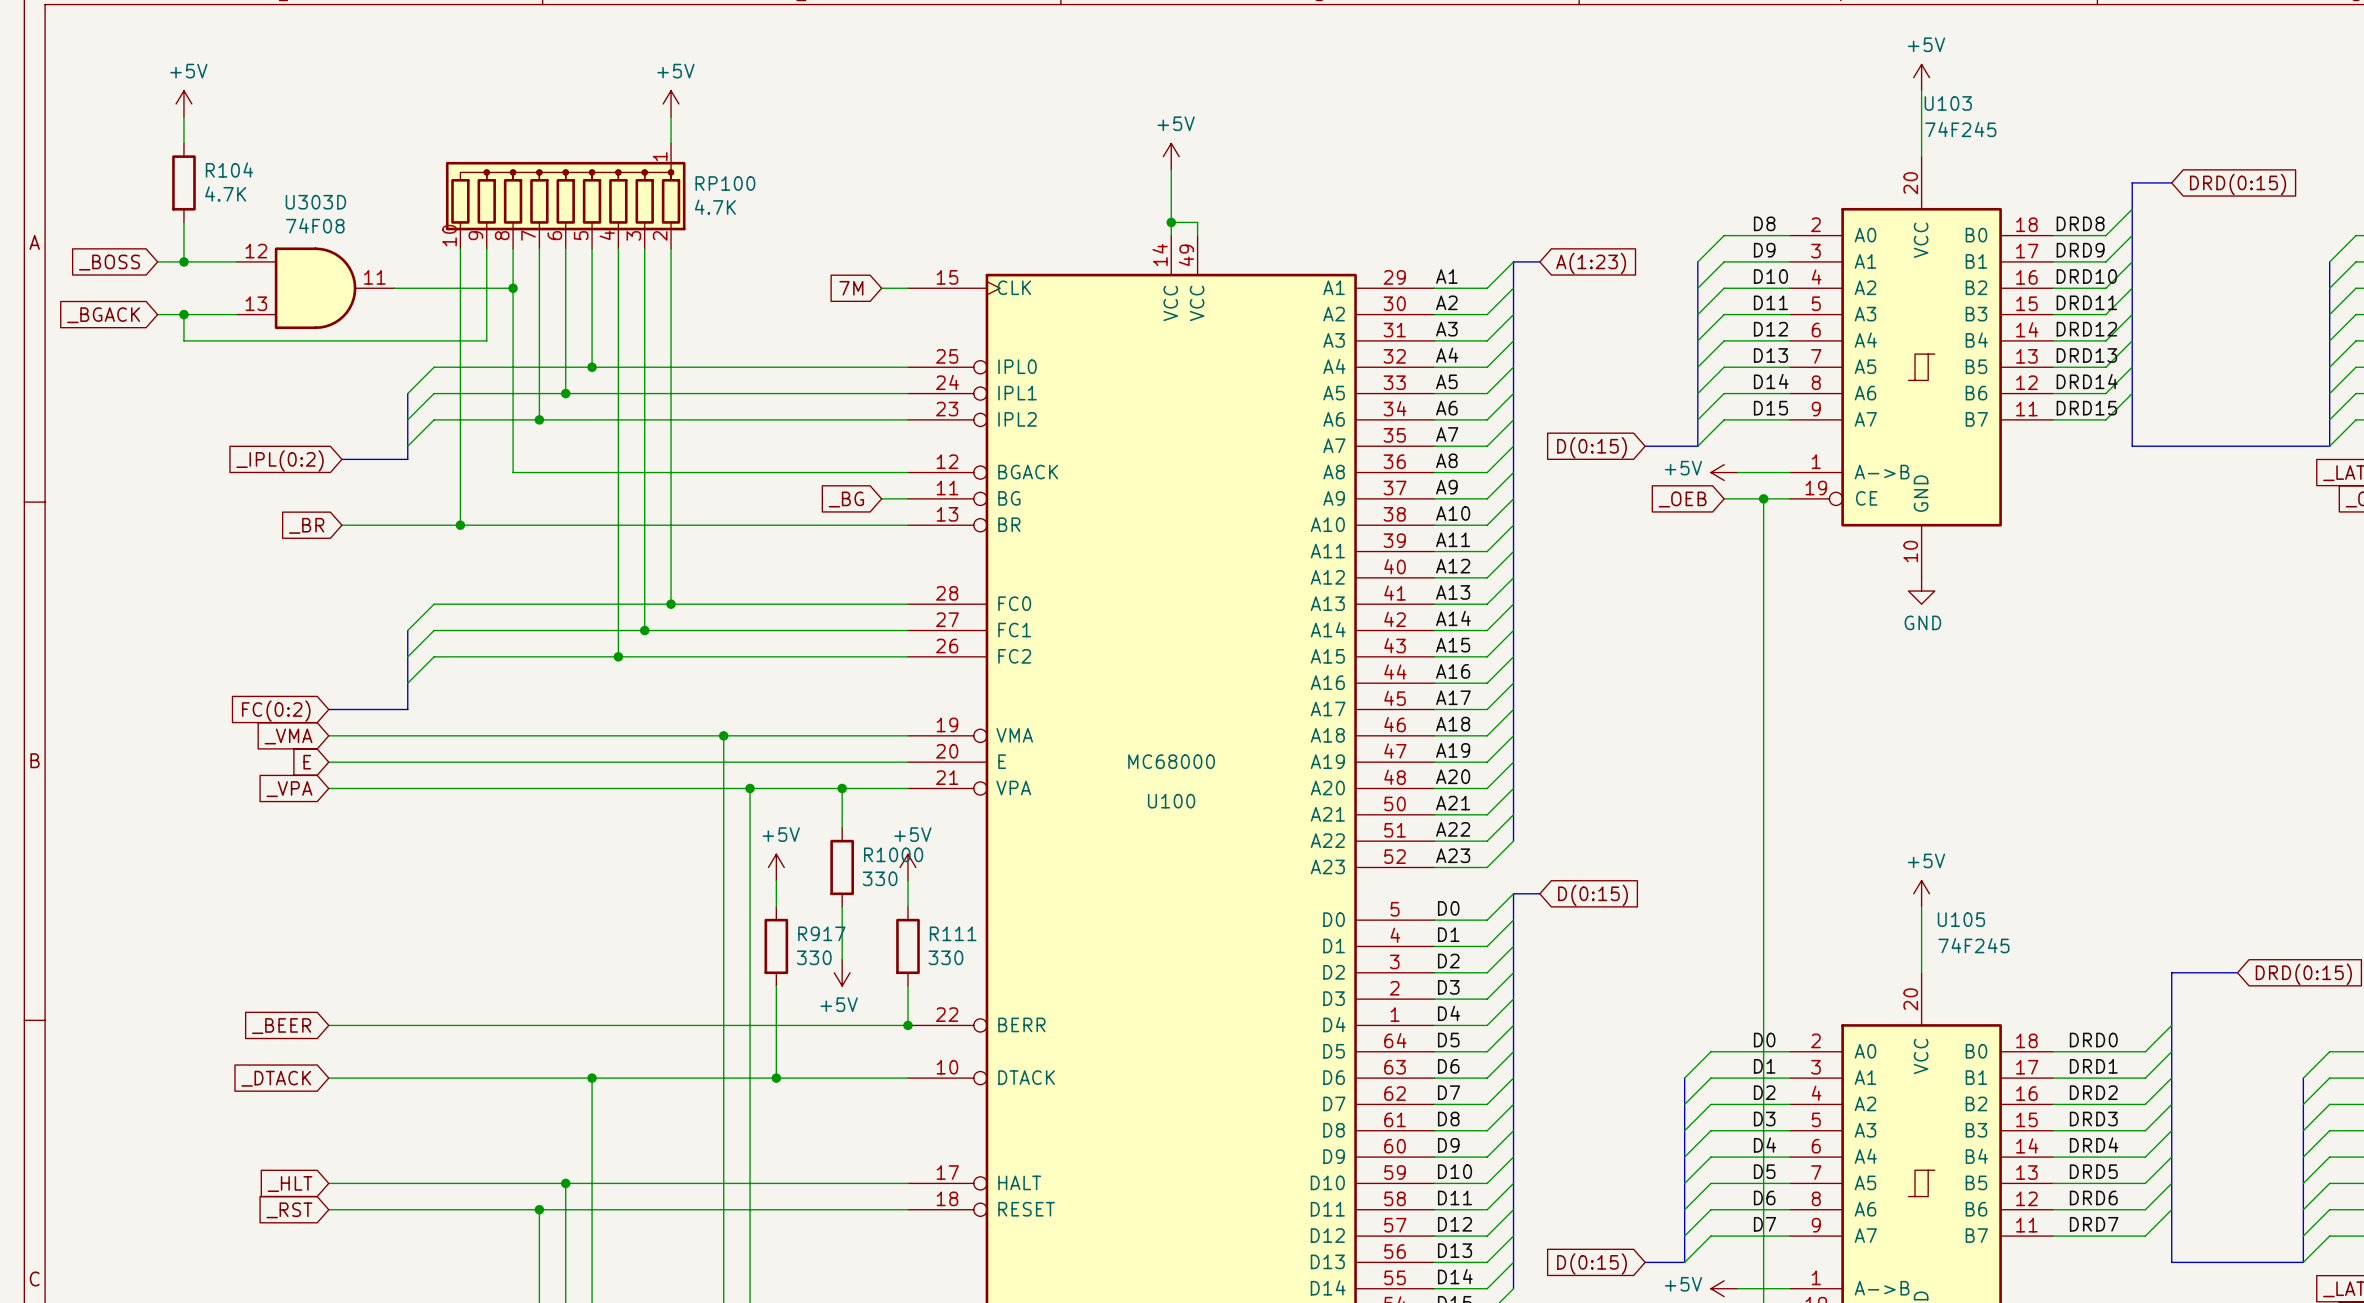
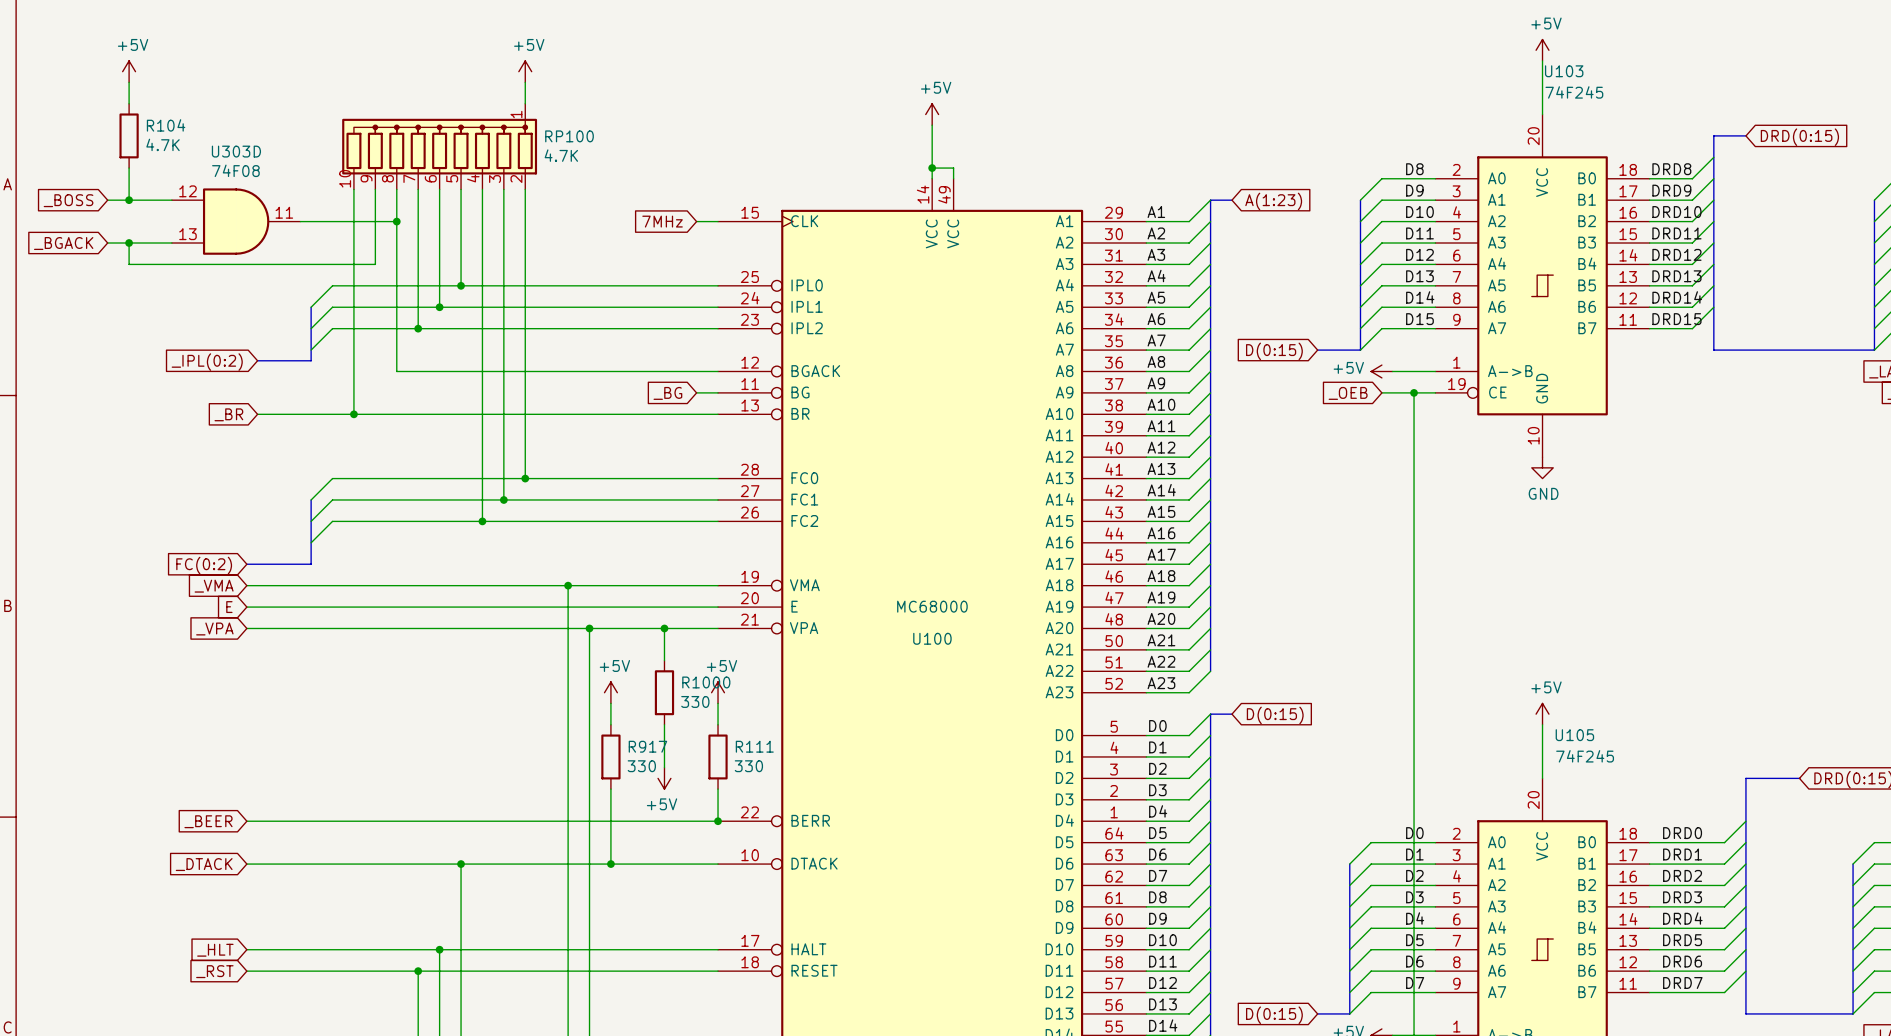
global label: 7M (851, 288) -> 7MHz (662, 221)

